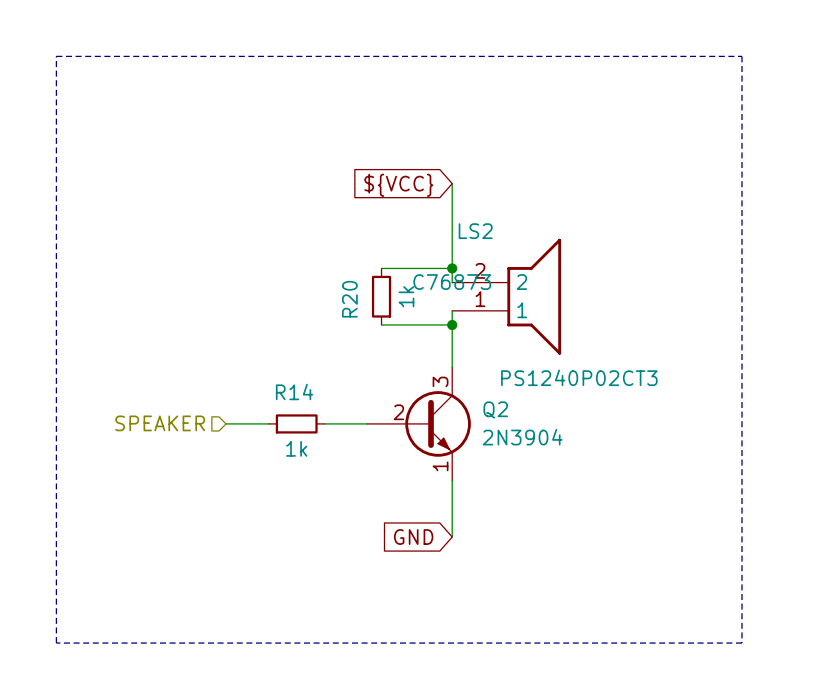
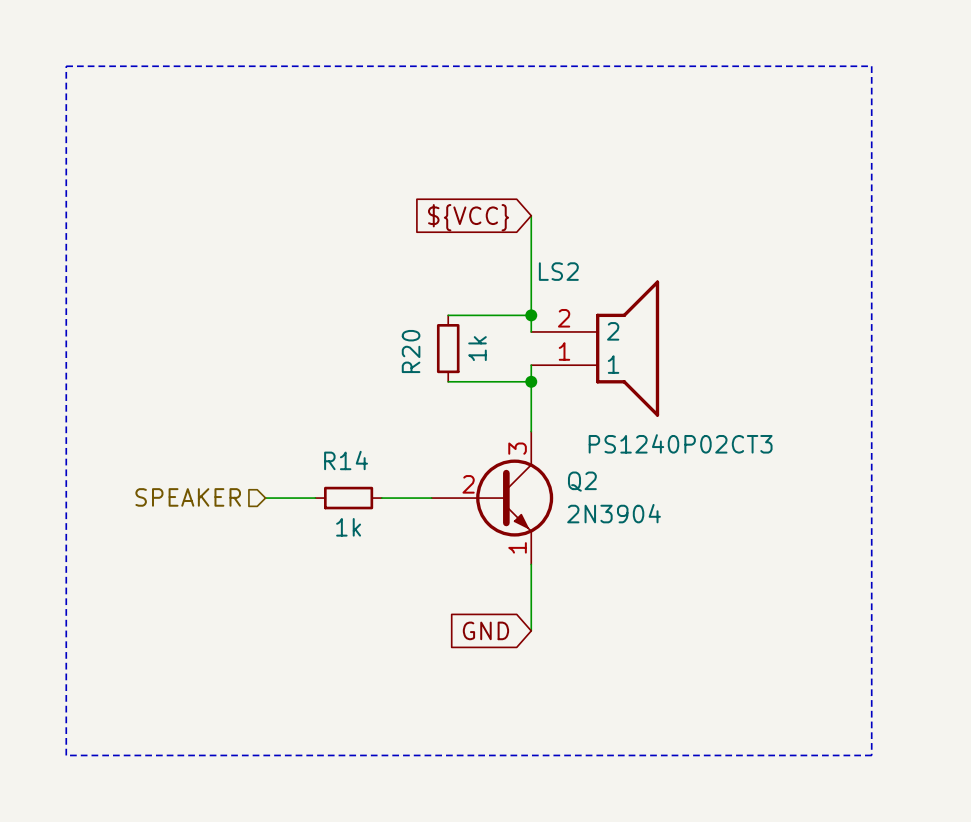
LS2 text: C76873 (452, 282) -> none

